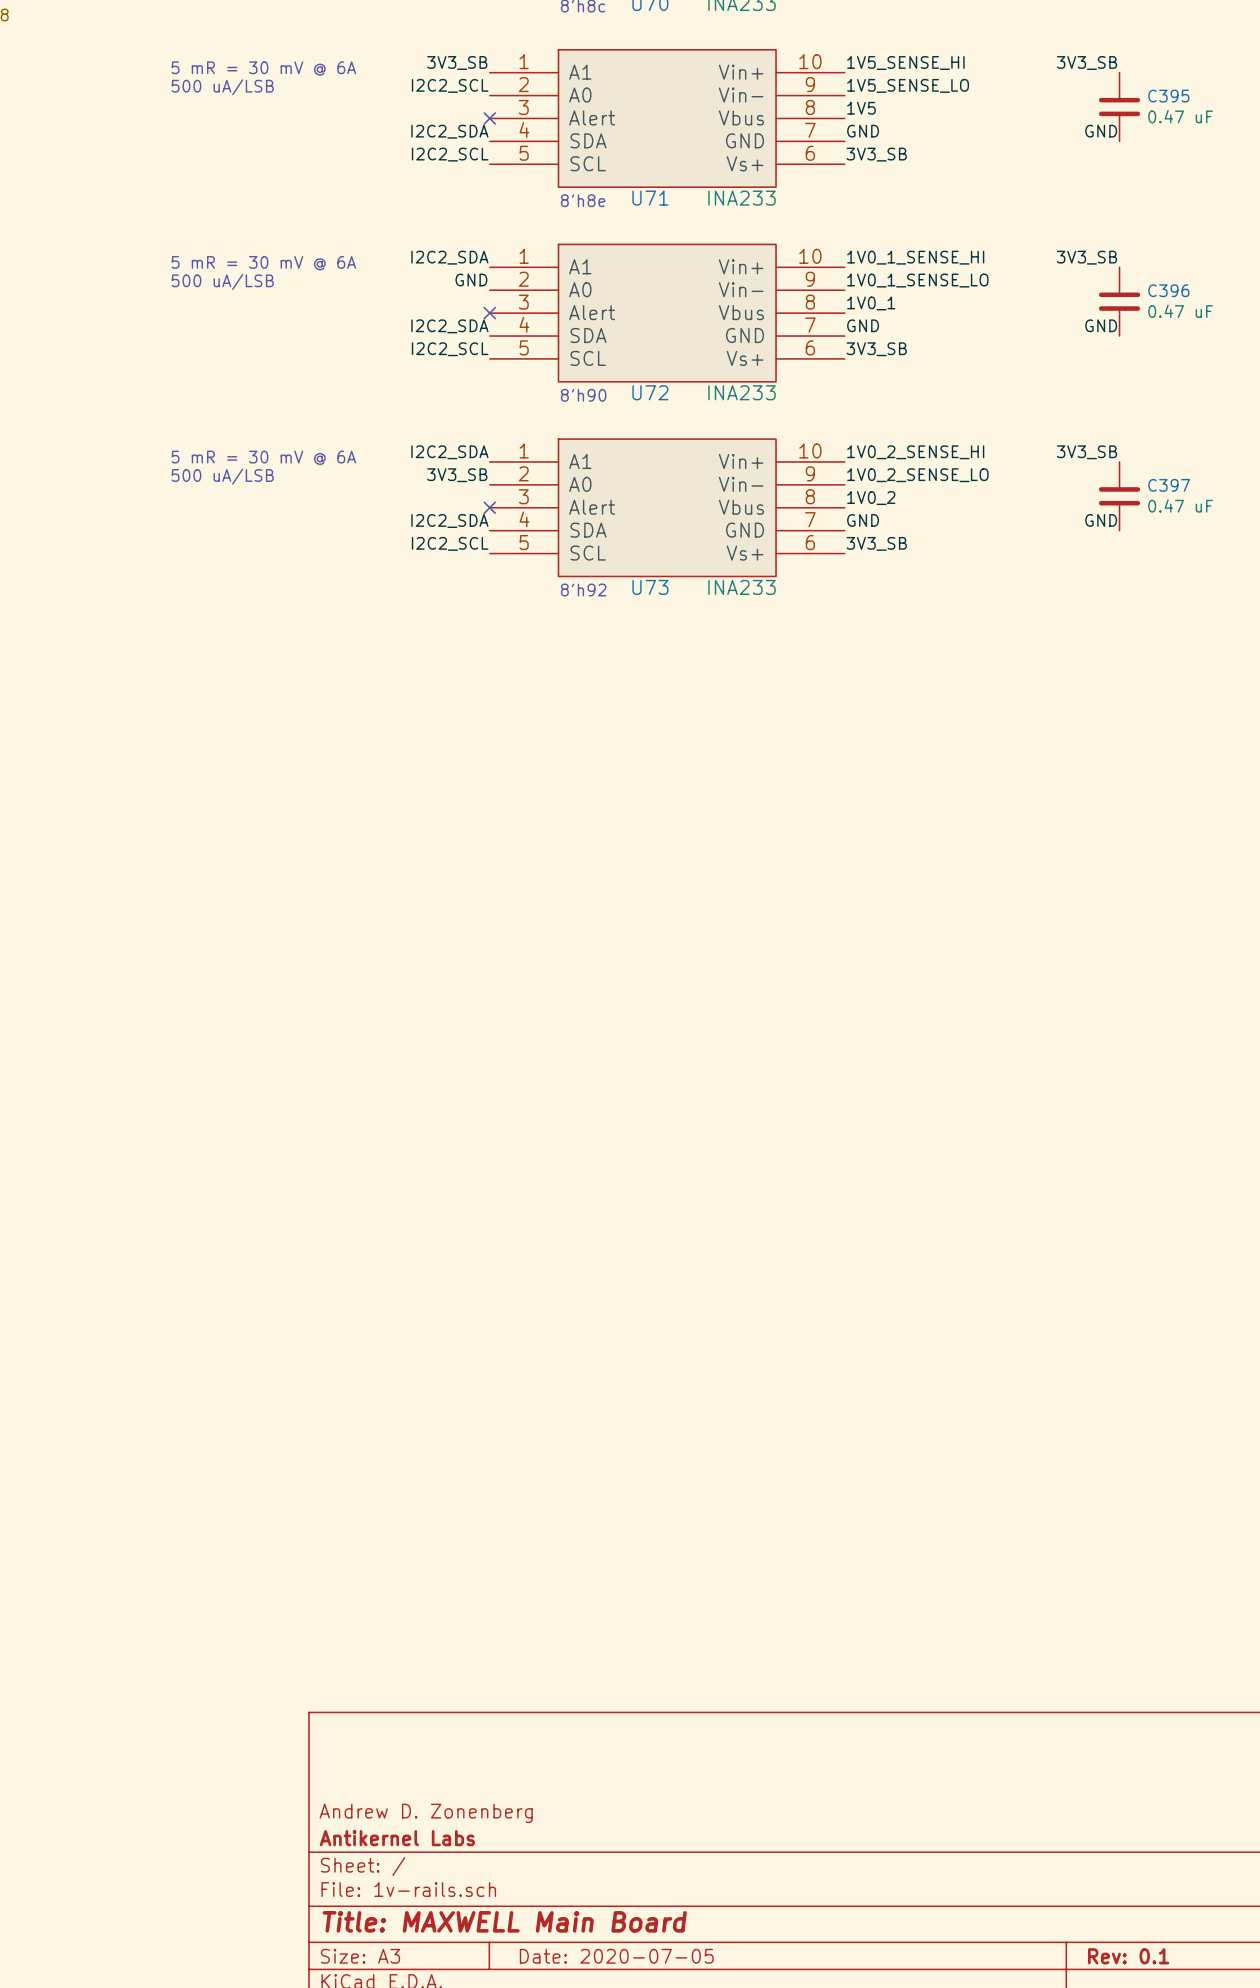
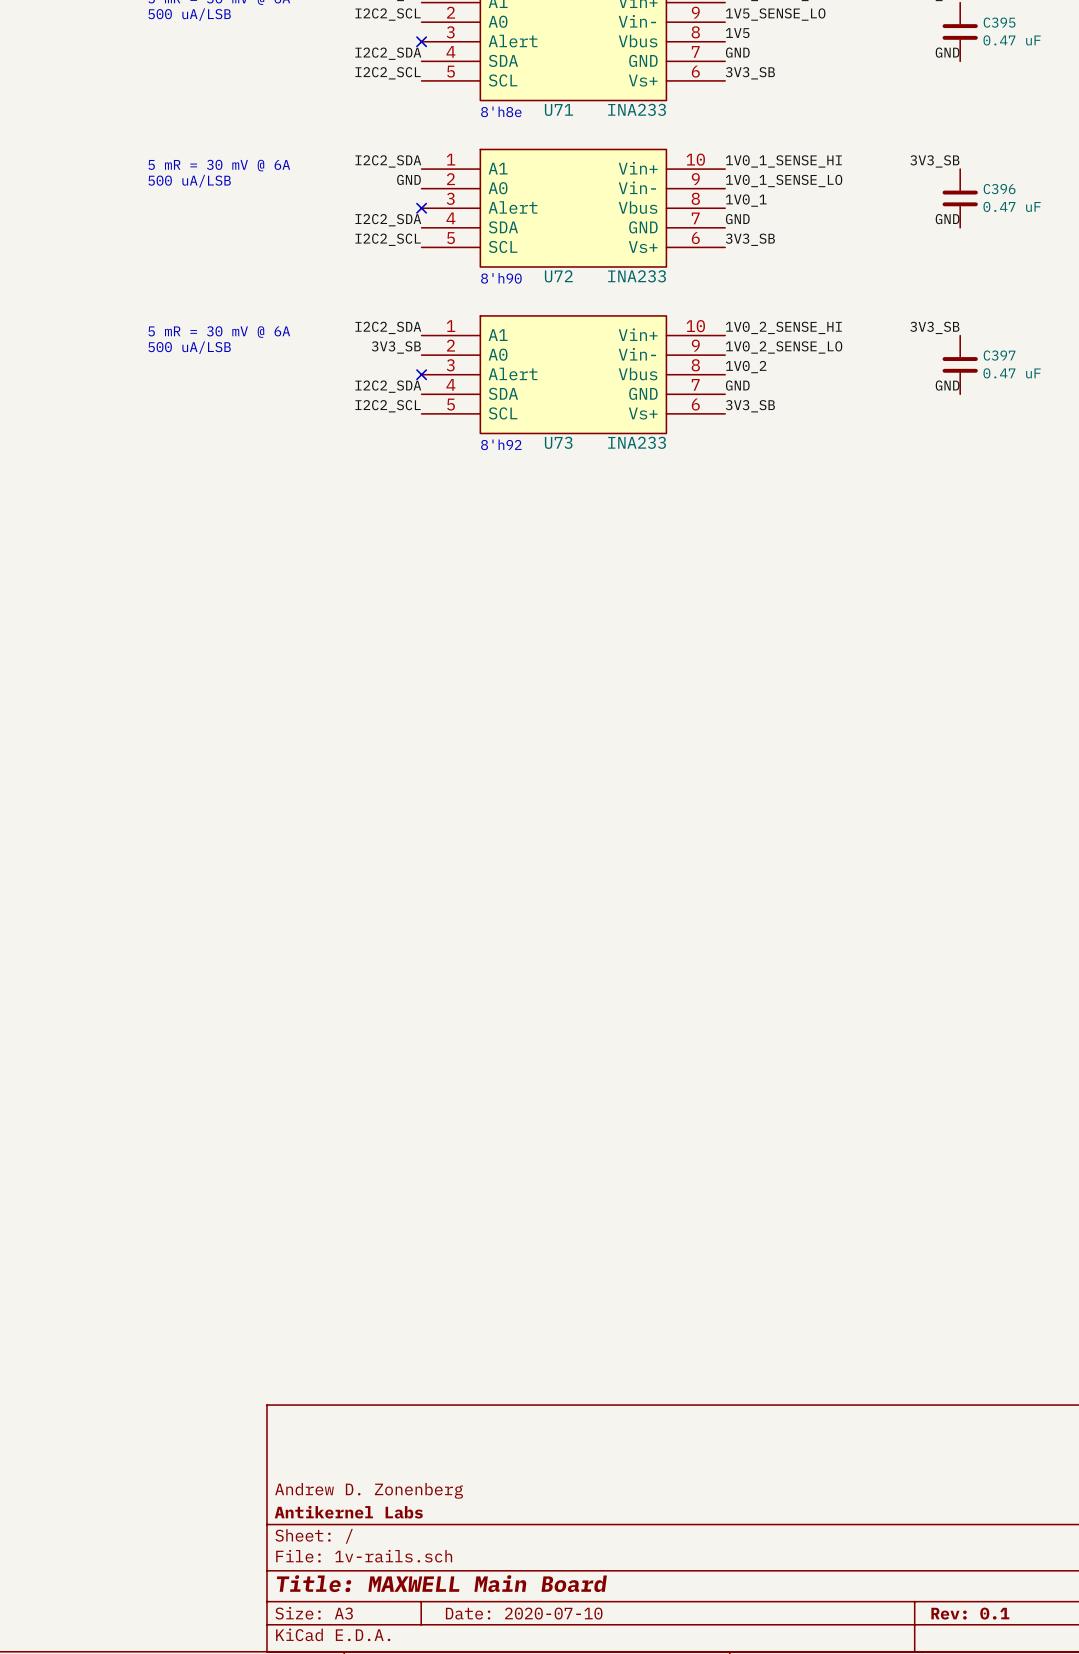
title block: Date: 2020-07-05 (616, 1956) -> Date: 2020-07-10 (524, 1613)

